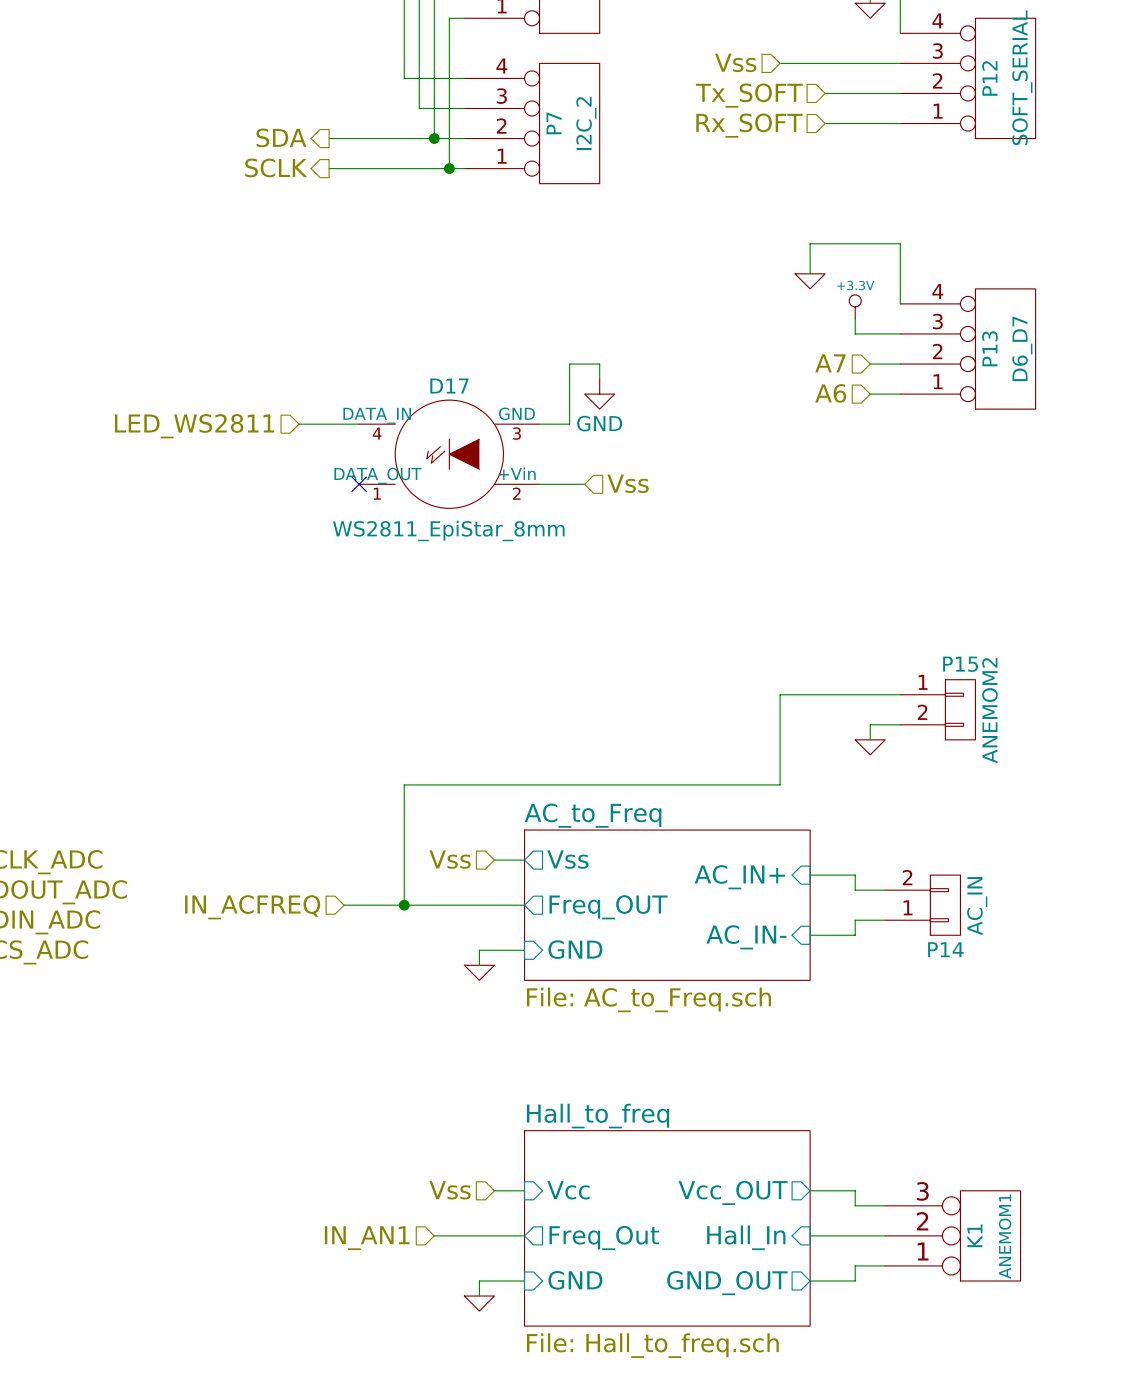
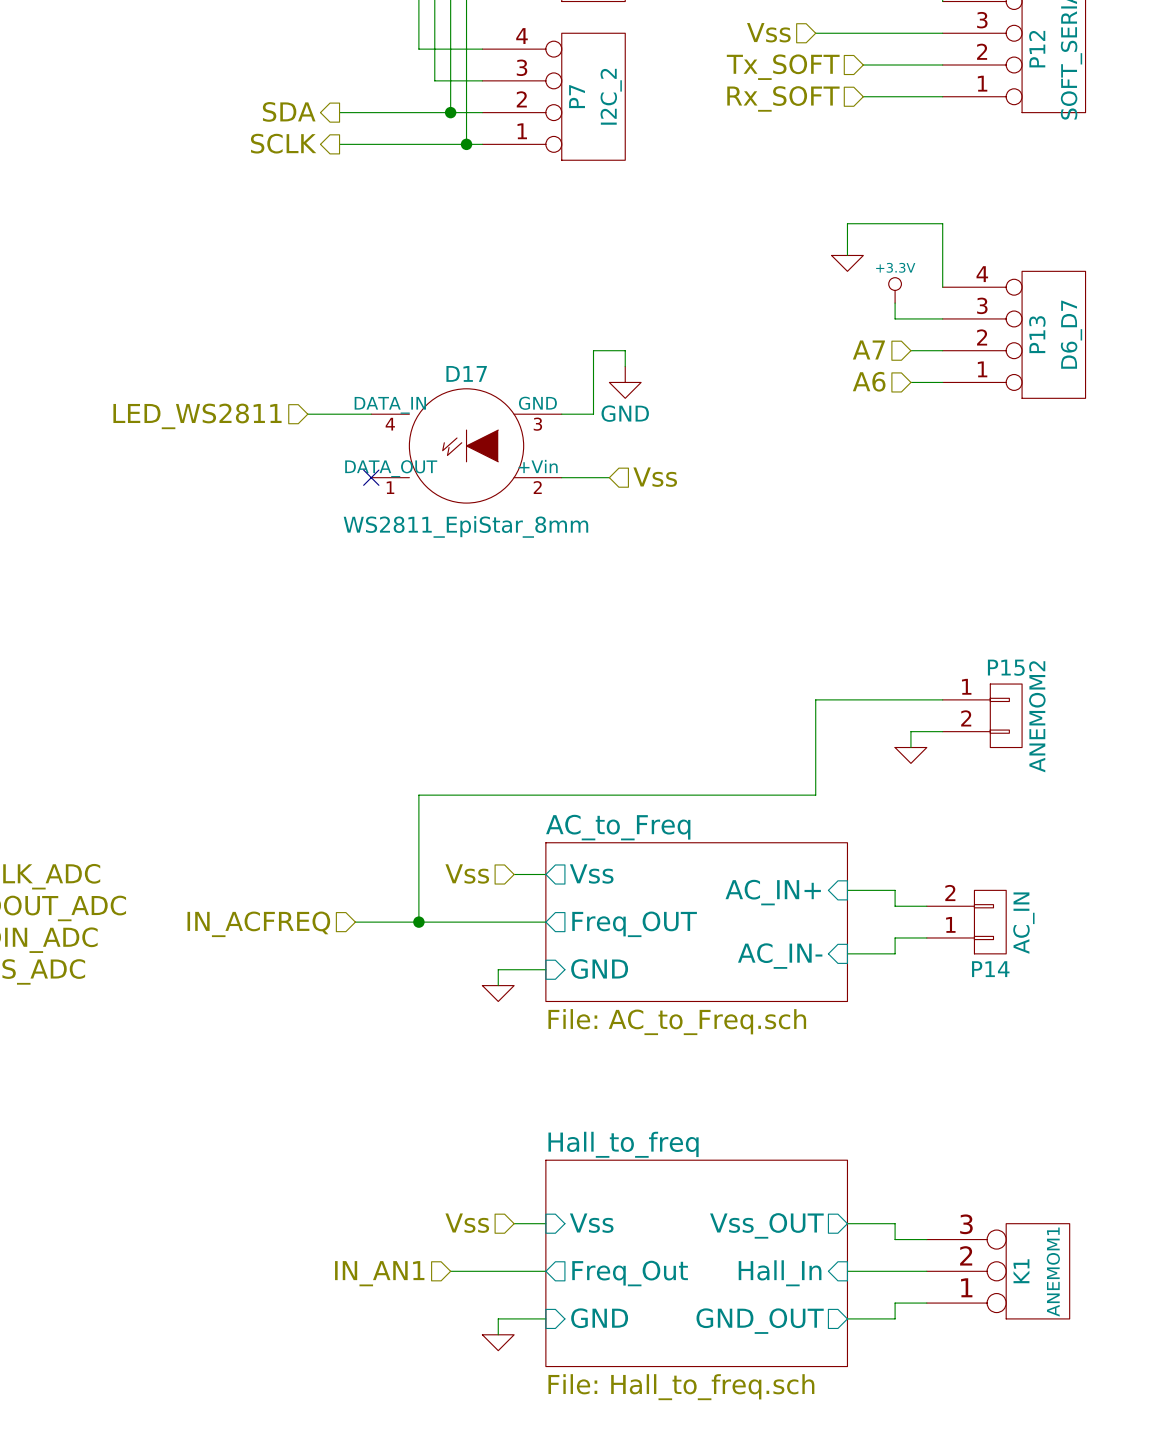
sheet pin: Vcc (568, 1190) -> Vss (591, 1223)
sheet pin: Vcc_OUT (733, 1192) -> Vss_OUT (766, 1225)

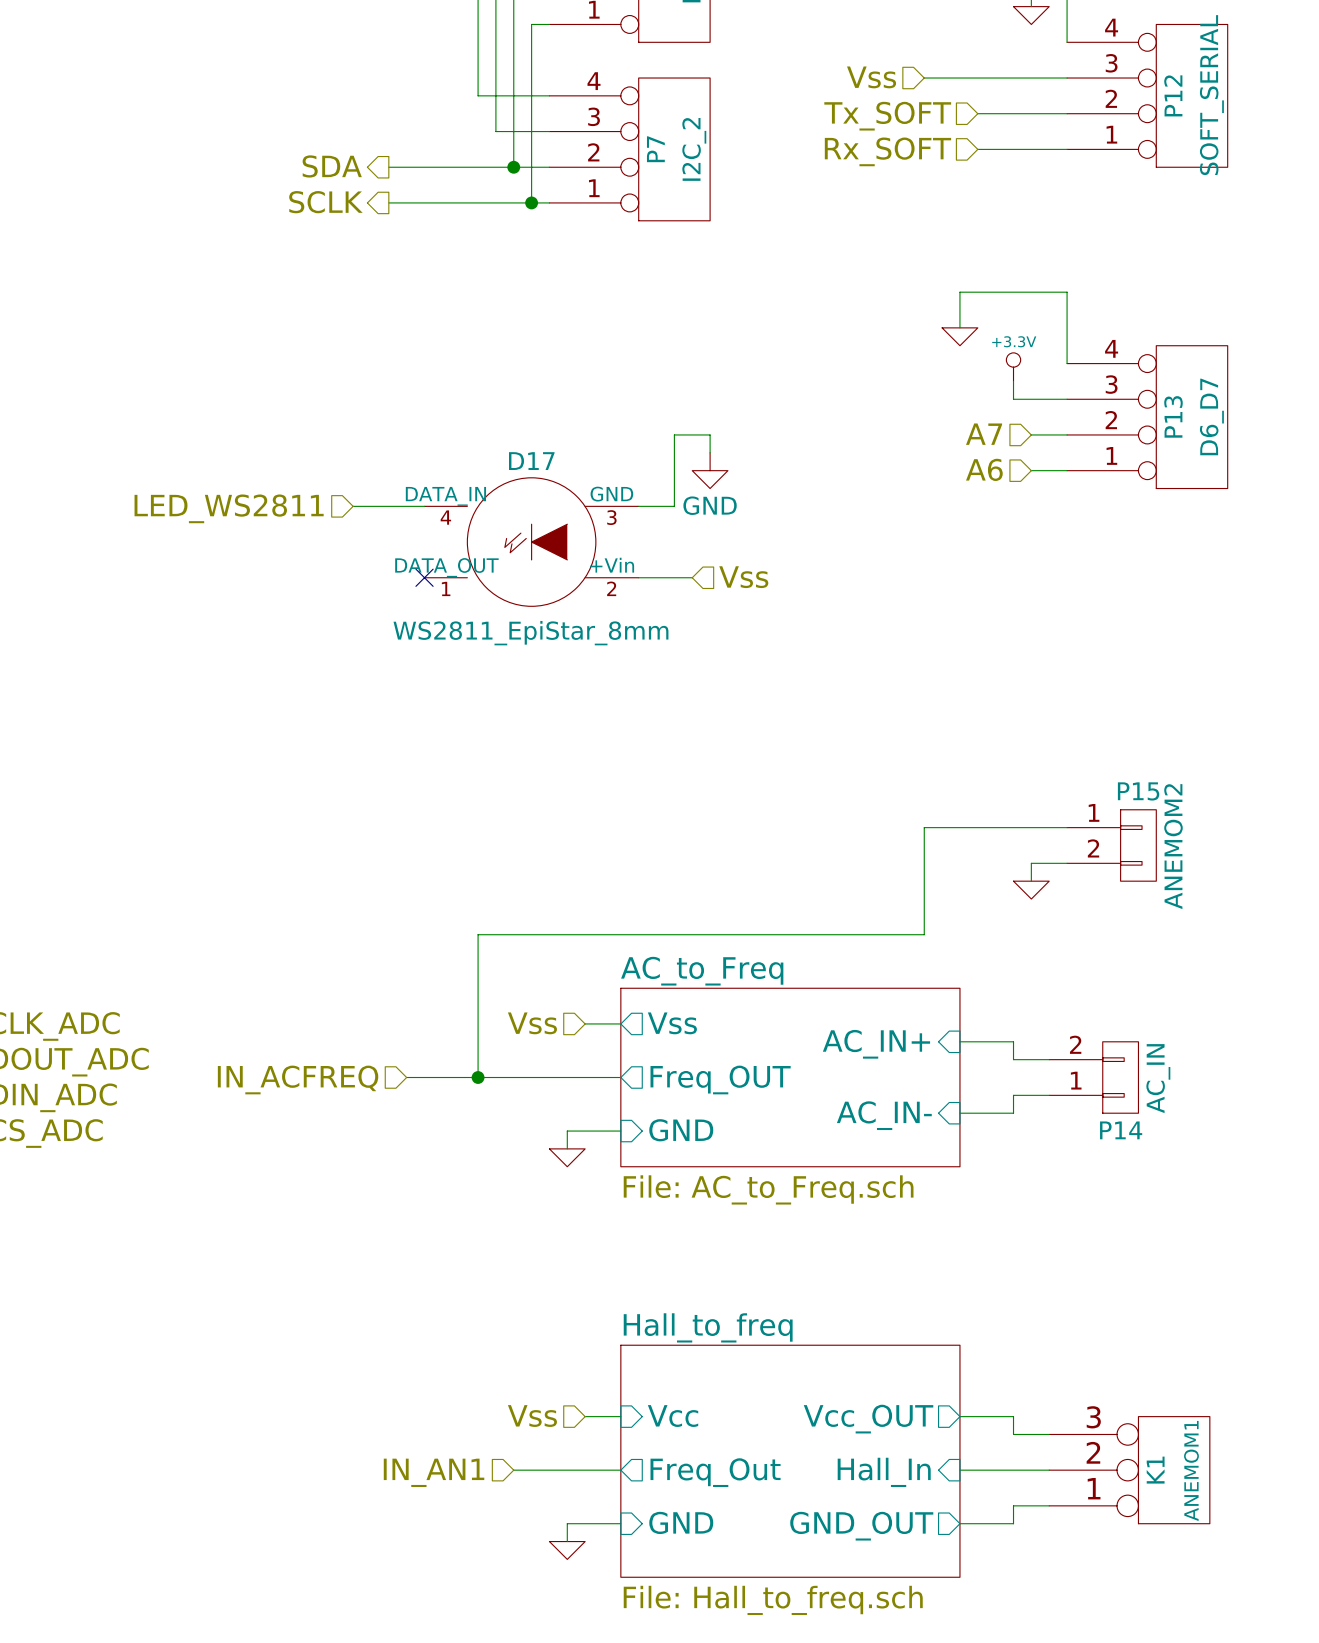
sheet pin: Vss (591, 1223) -> Vcc (673, 1416)
sheet pin: Vss_OUT (766, 1225) -> Vcc_OUT (868, 1419)

